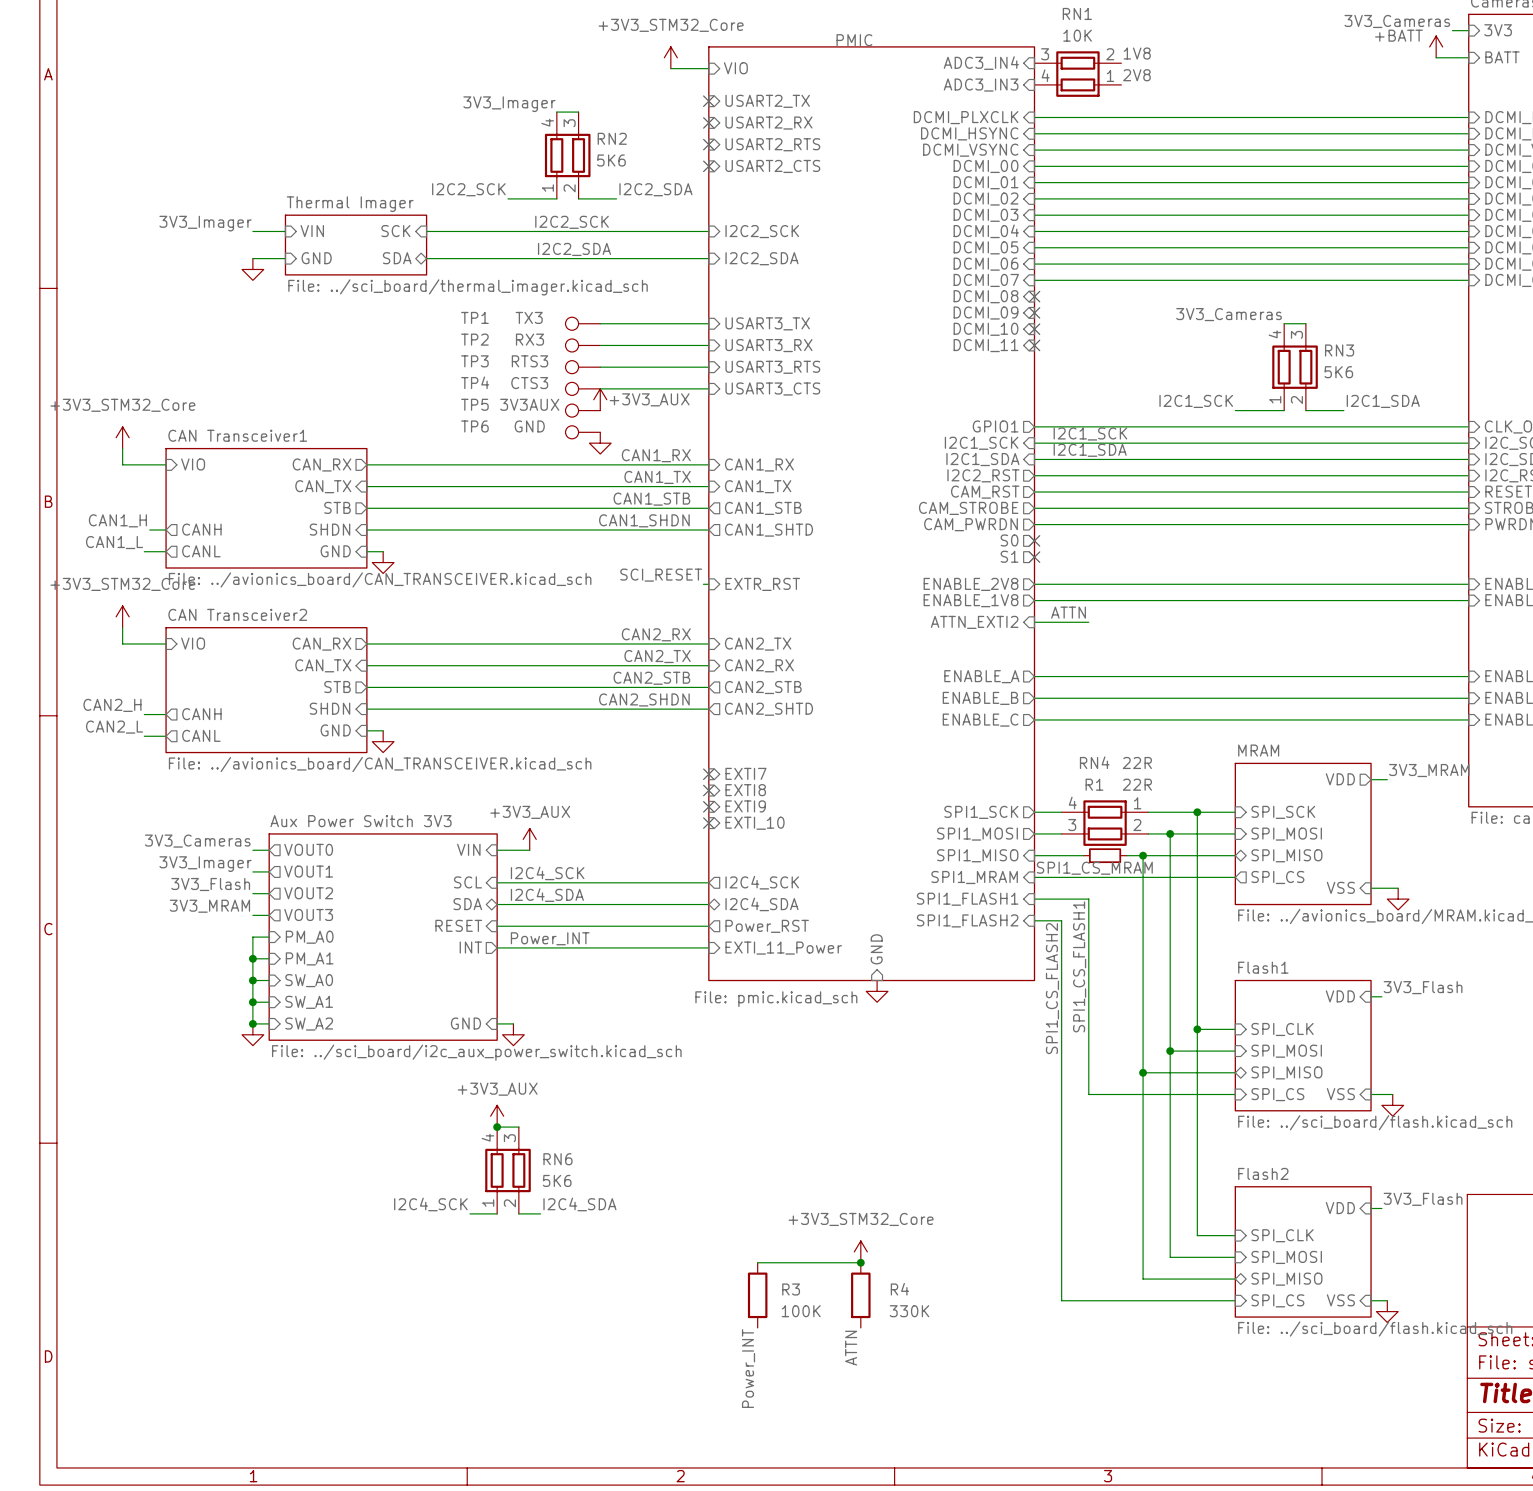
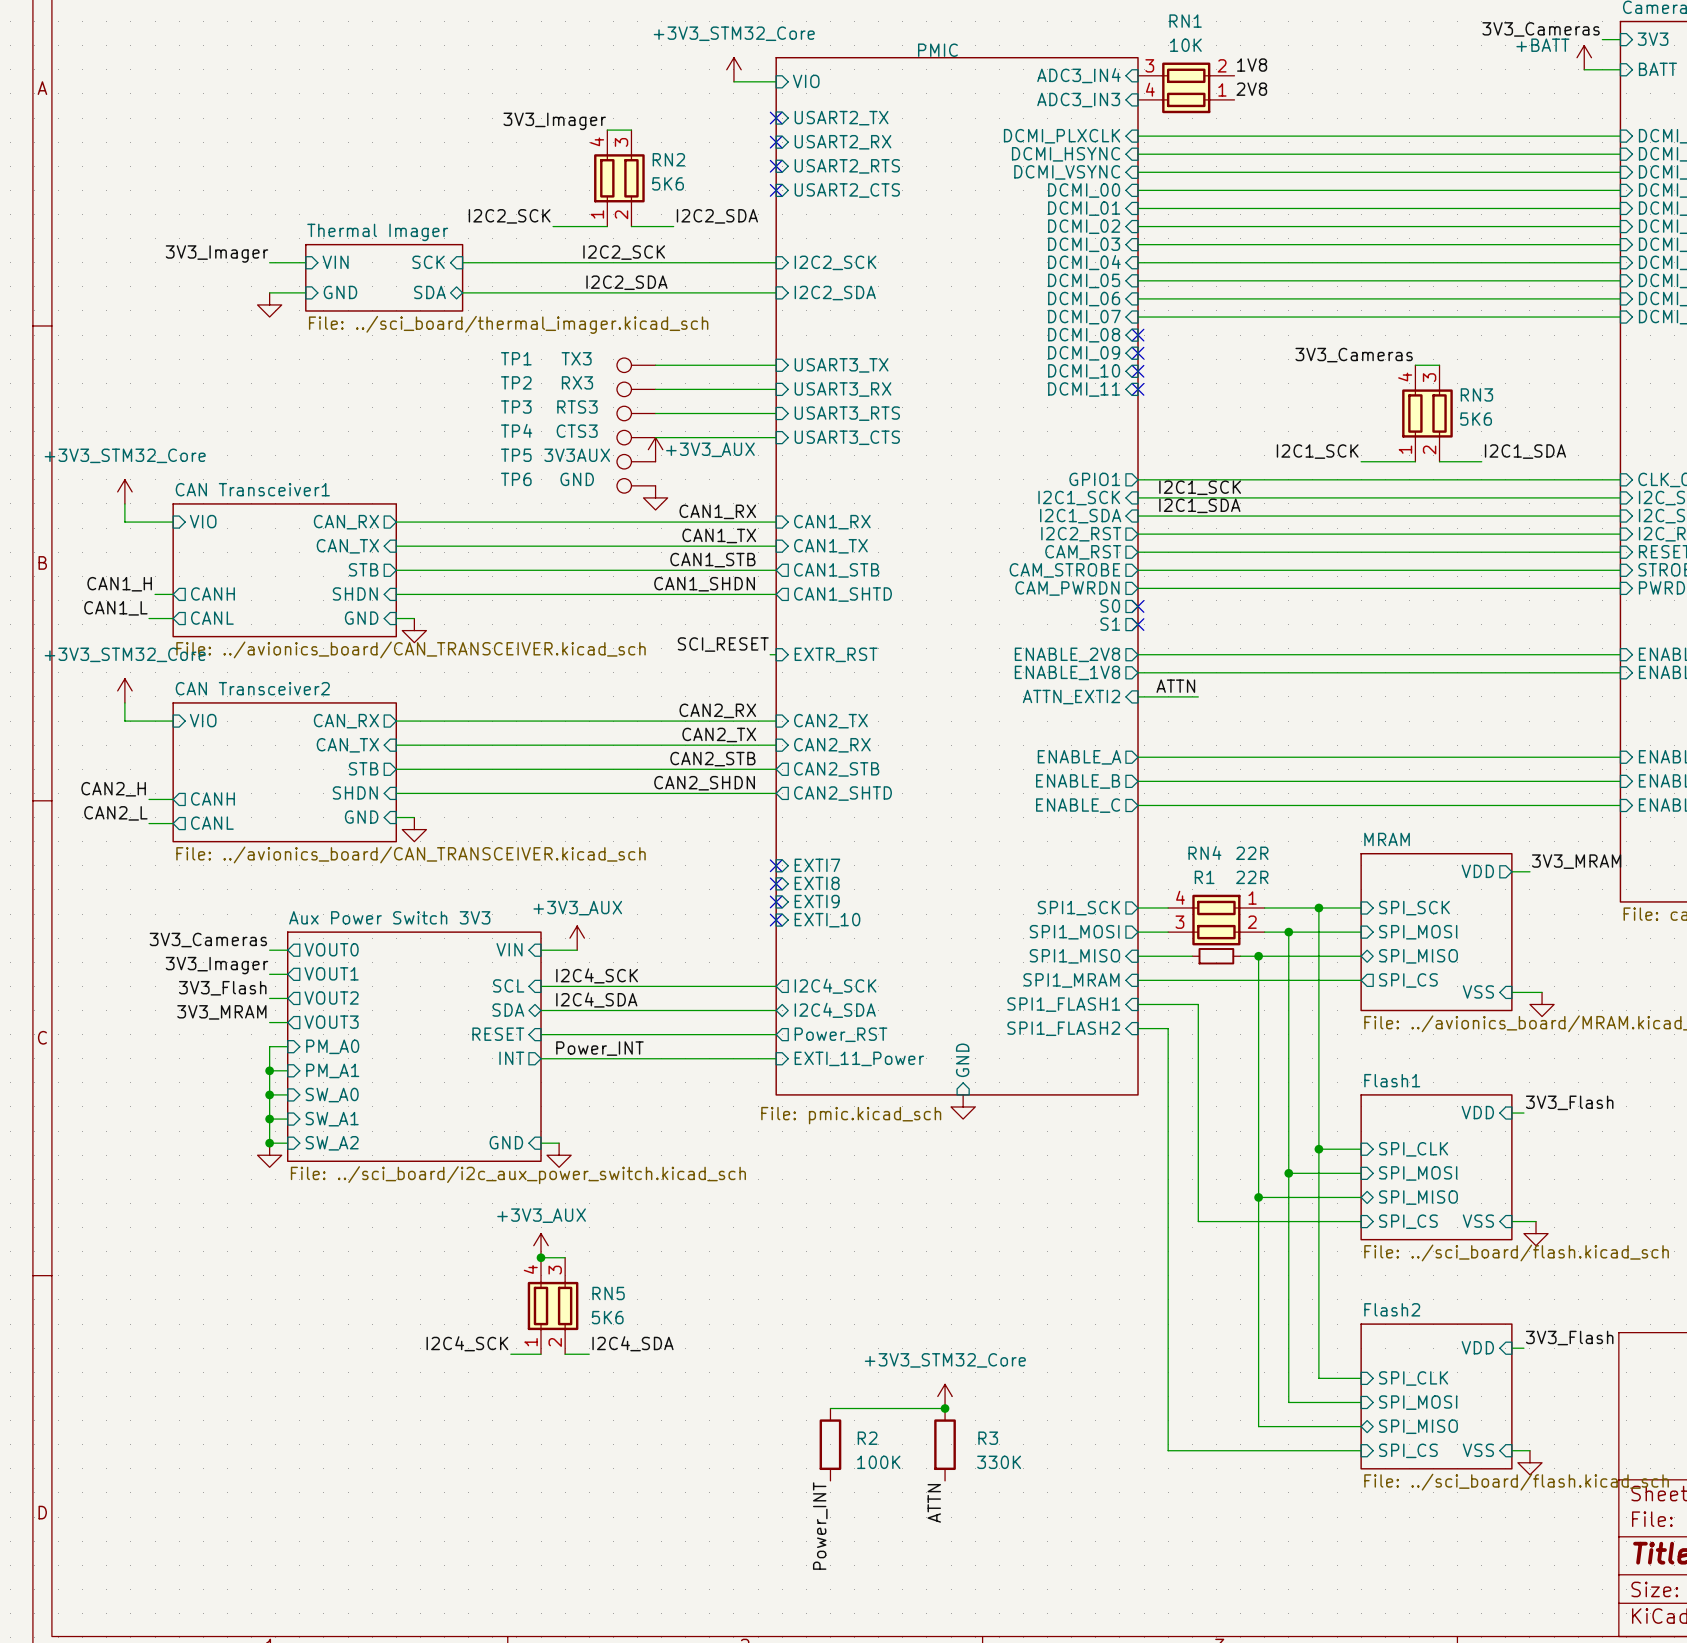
label: SPI1_CS_MRAM (1094, 868) -> none
label: SPI1_CS_FLASH1 (1079, 966) -> none
label: SPI1_CS_FLASH2 (1052, 988) -> none
RN6 name: RN6 (557, 1159) -> RN5 (608, 1293)
R3 name: R3 (791, 1289) -> R2 (867, 1438)
R4 name: R4 (899, 1289) -> R3 (988, 1438)

